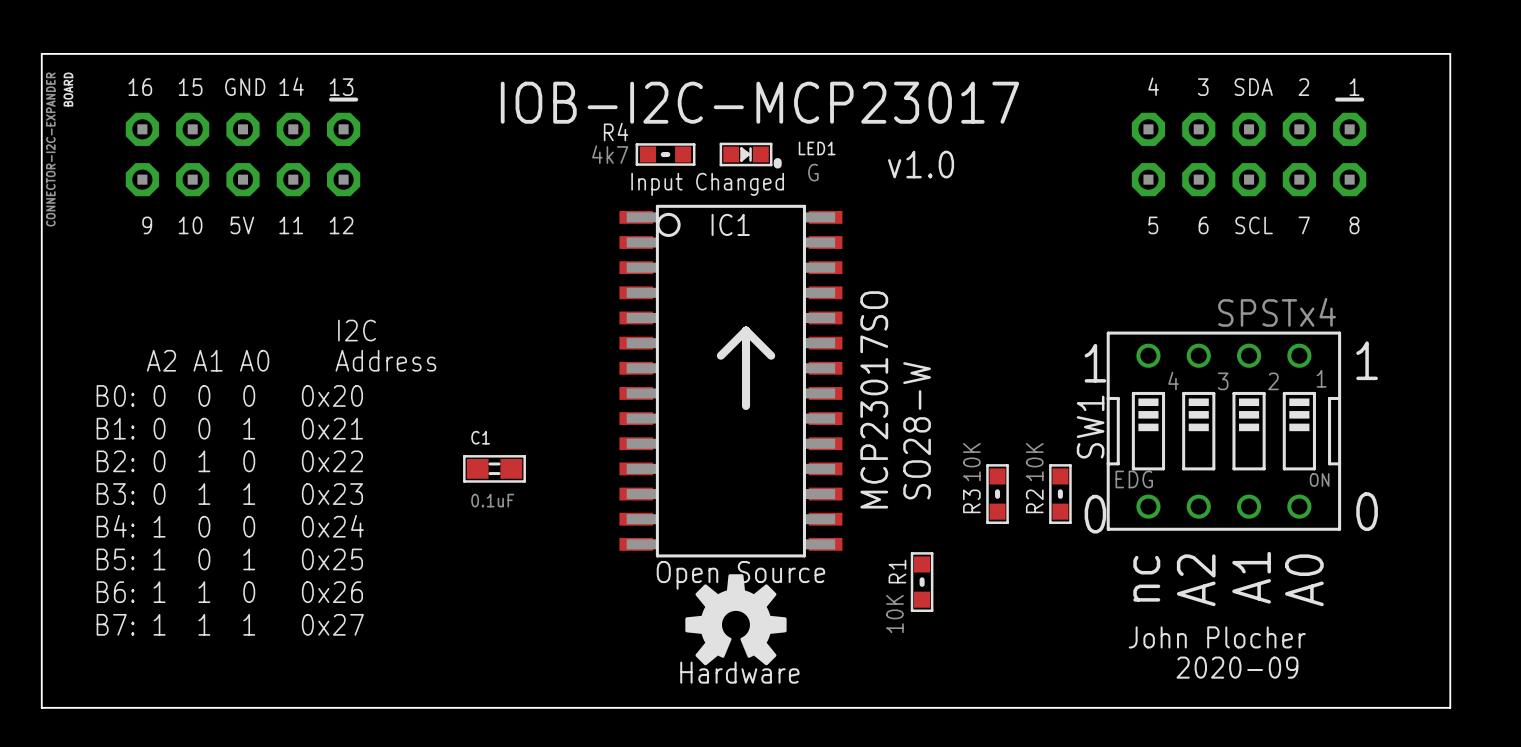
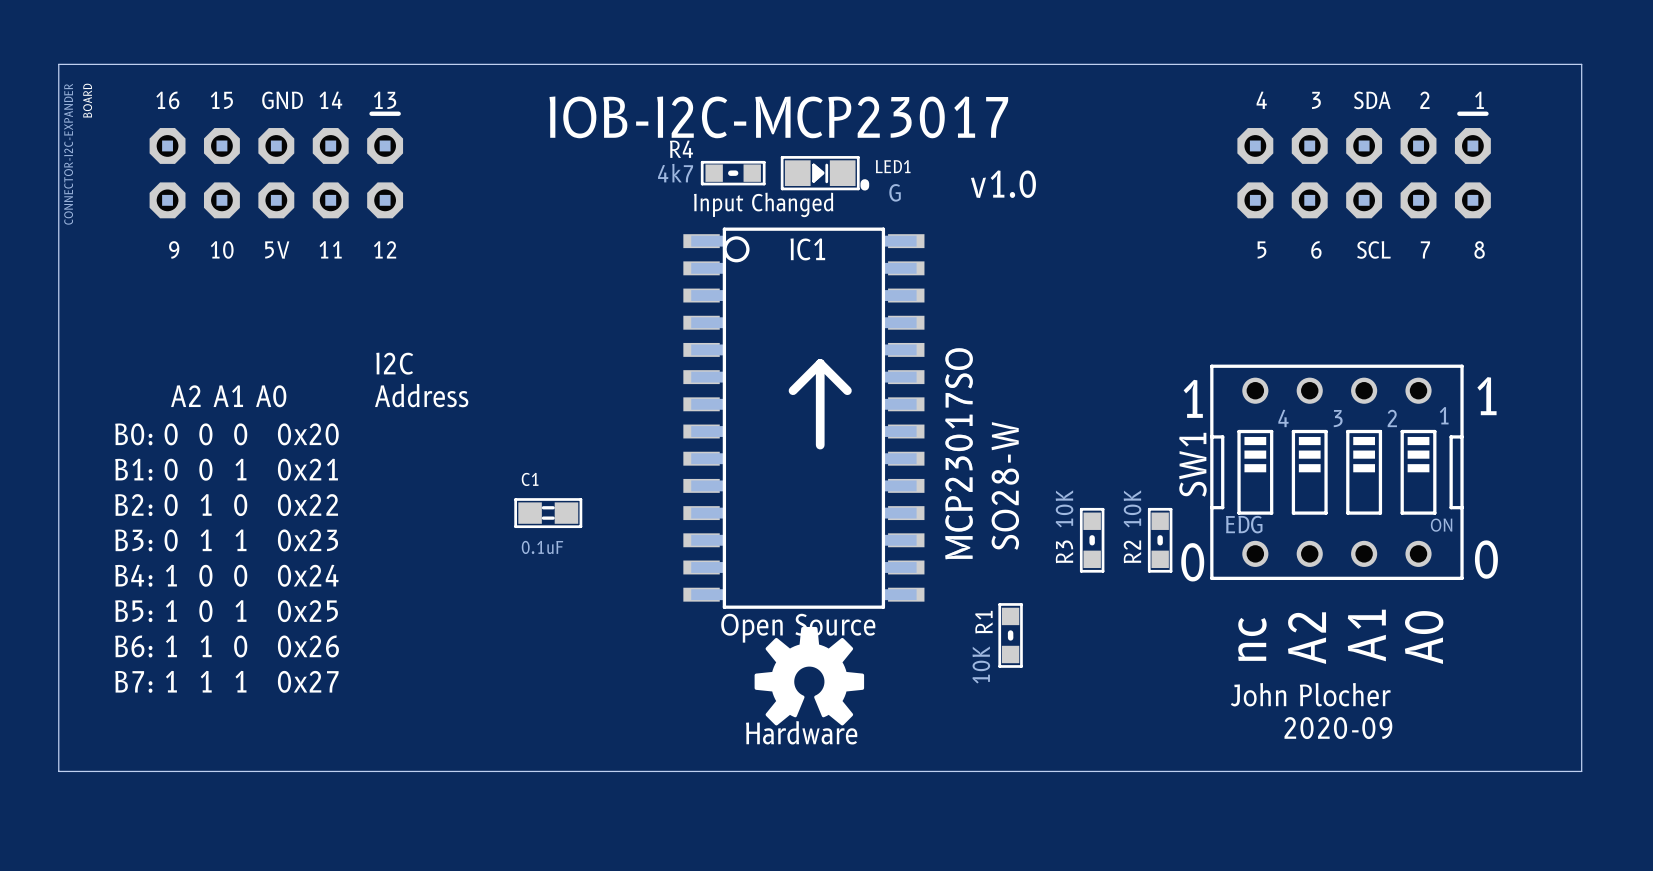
LED1 footprint: [719, 142, 782, 169] -> [780, 156, 870, 191]
SW1 value: SPSTx4 (1277, 312) -> none

